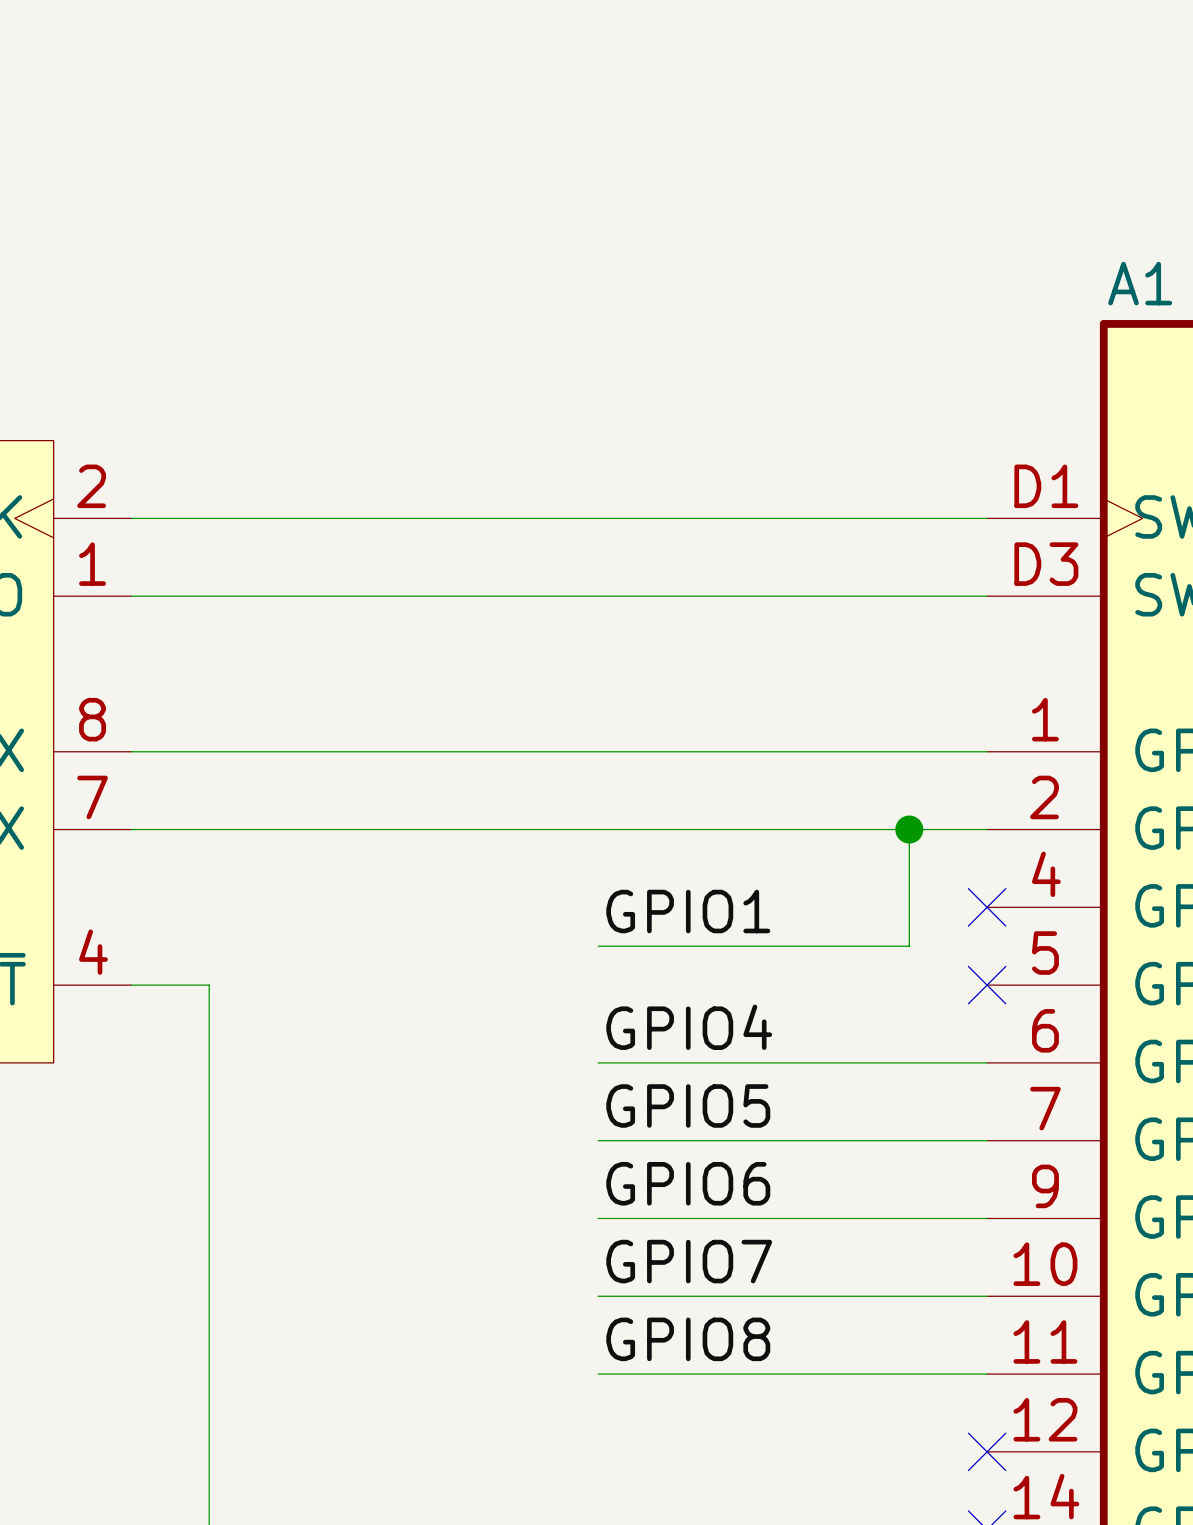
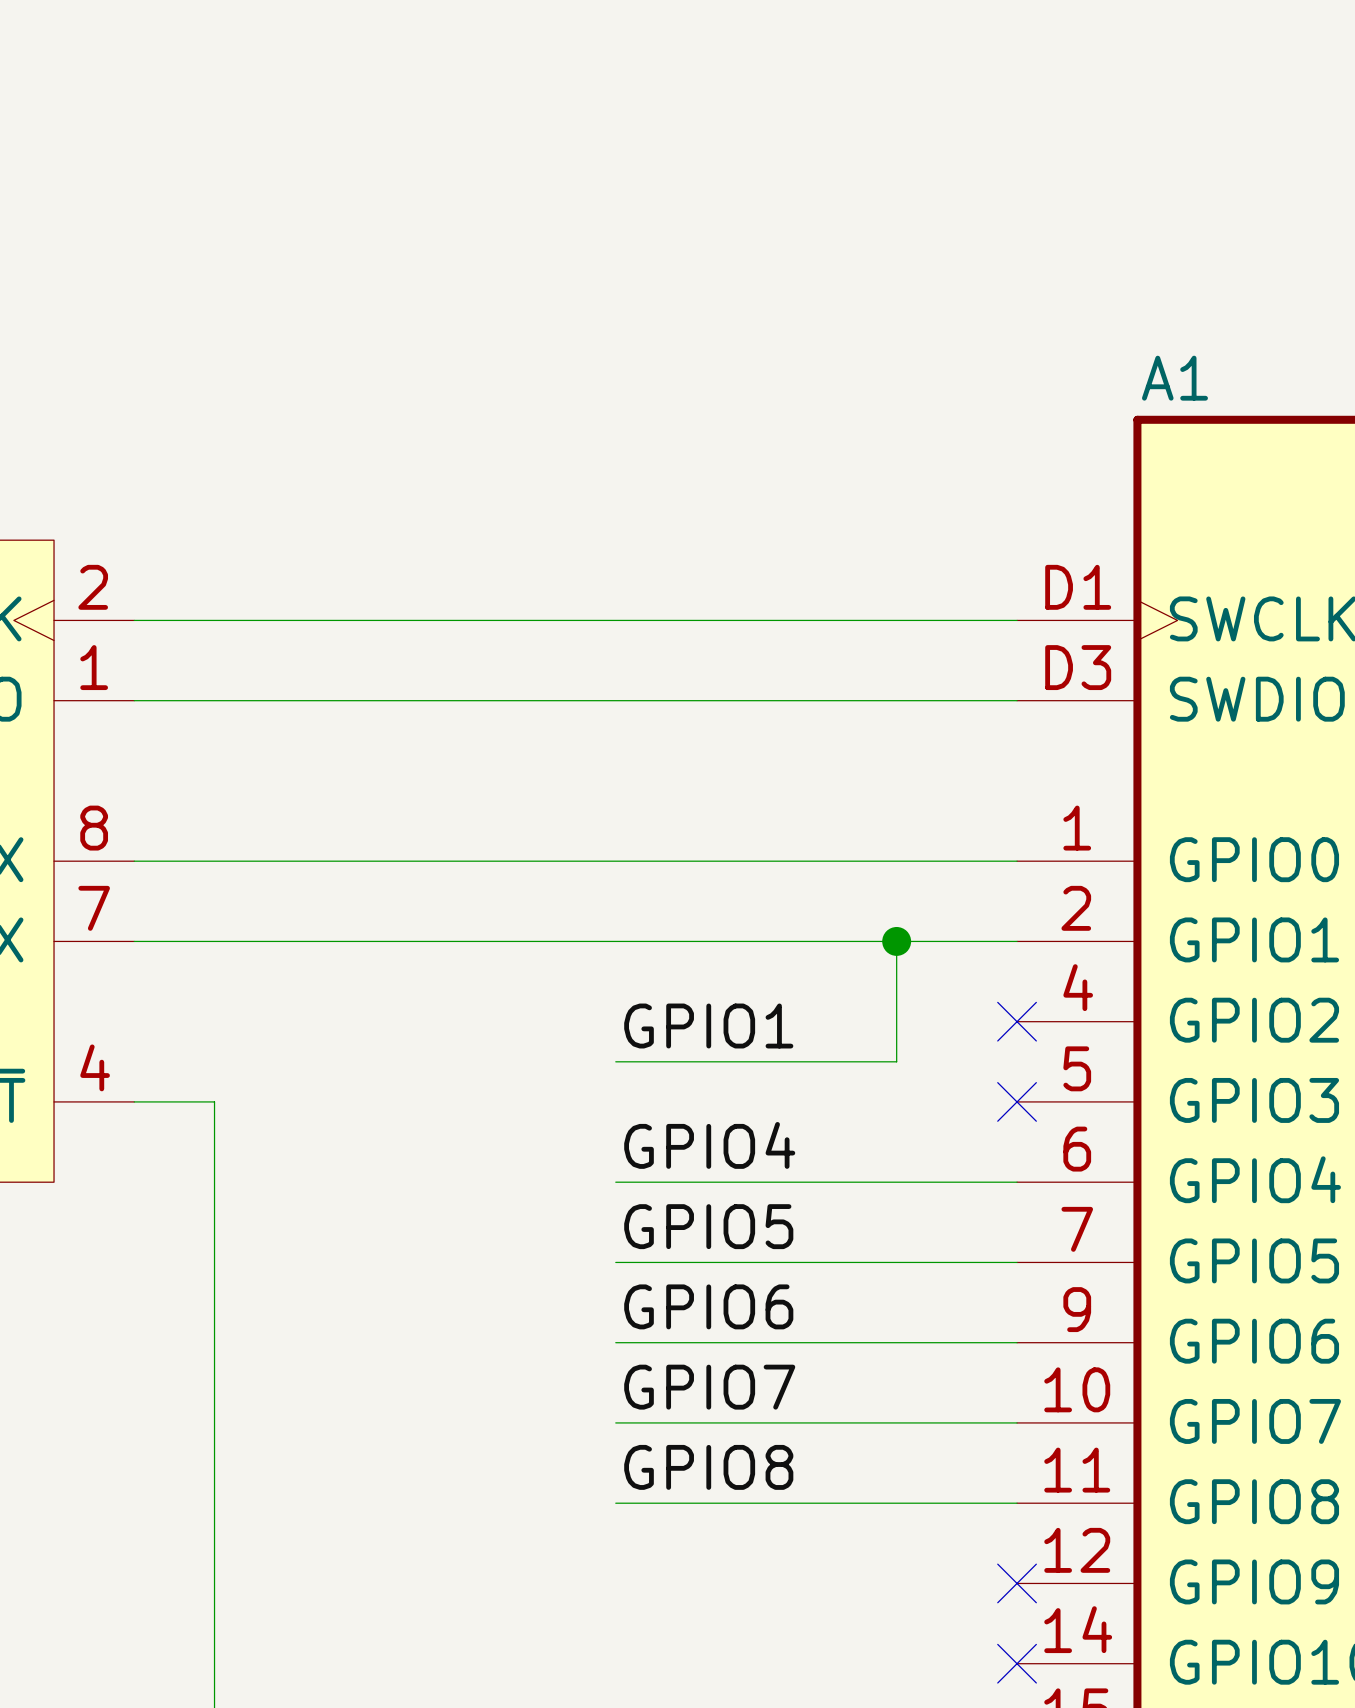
wire: (909, 829) (909, 946) (870, 946) -> (896, 941) (896, 1061)
junction position: (909, 829) -> (896, 941)

